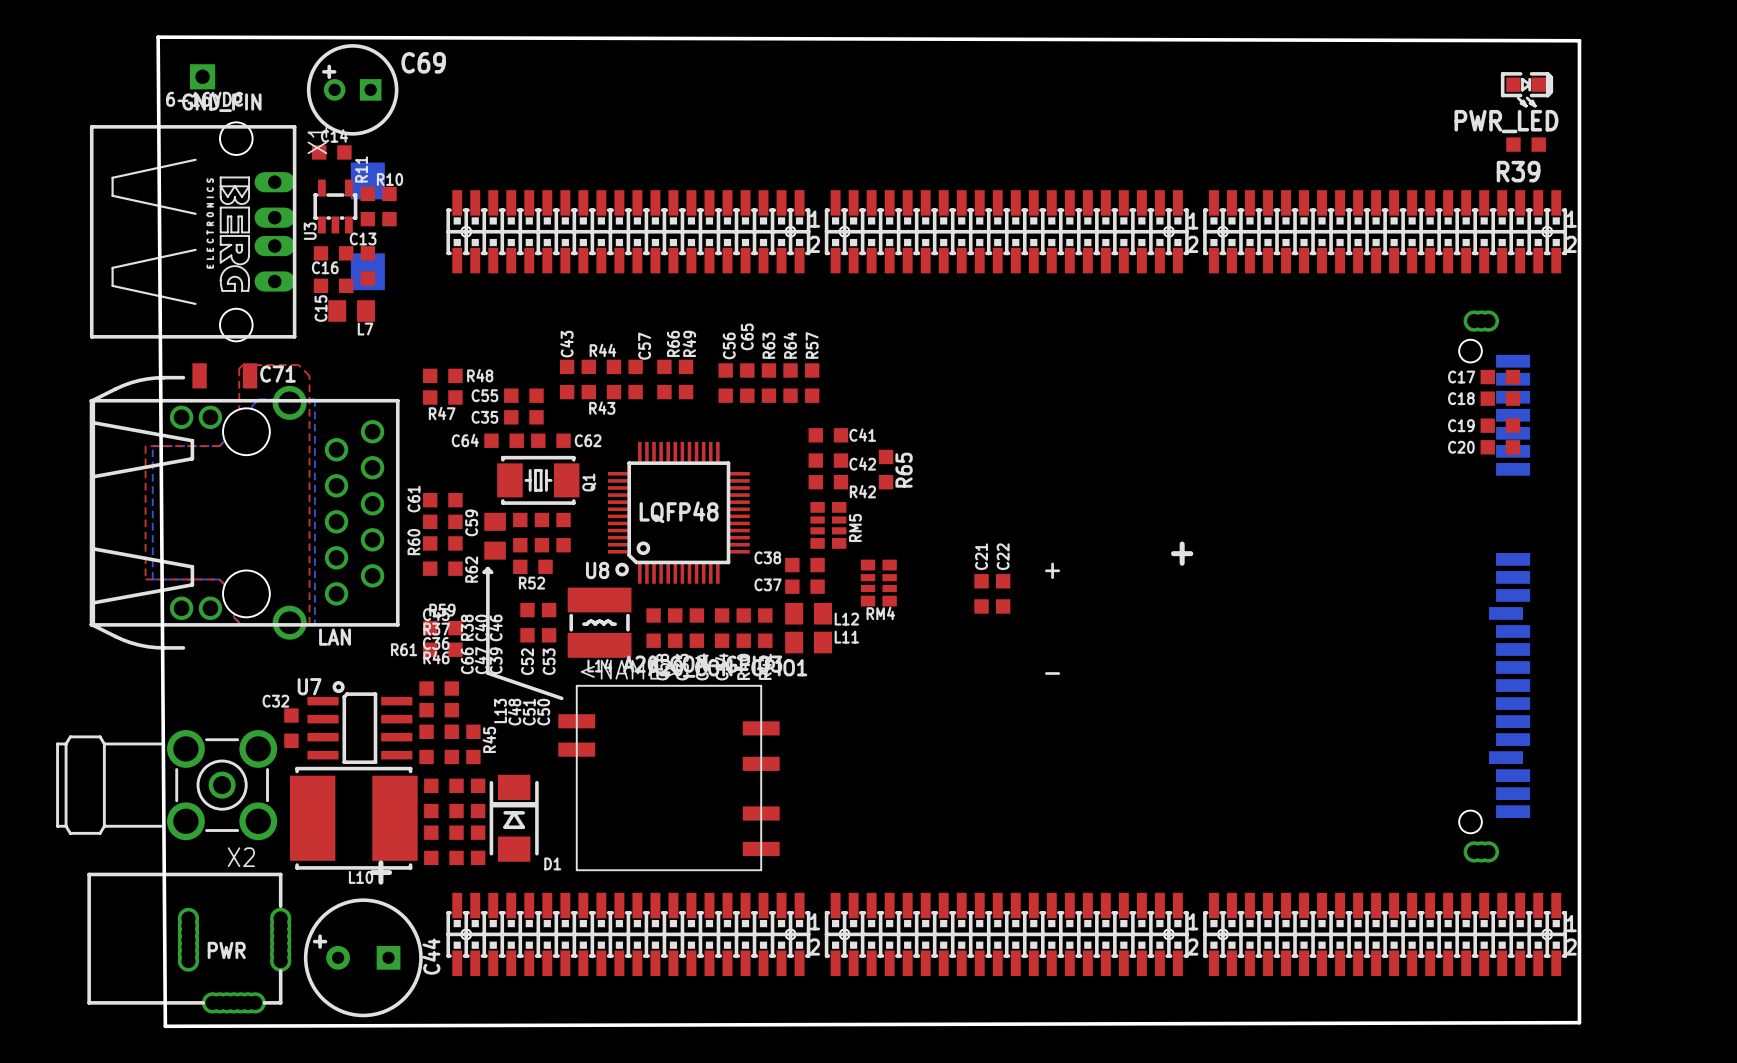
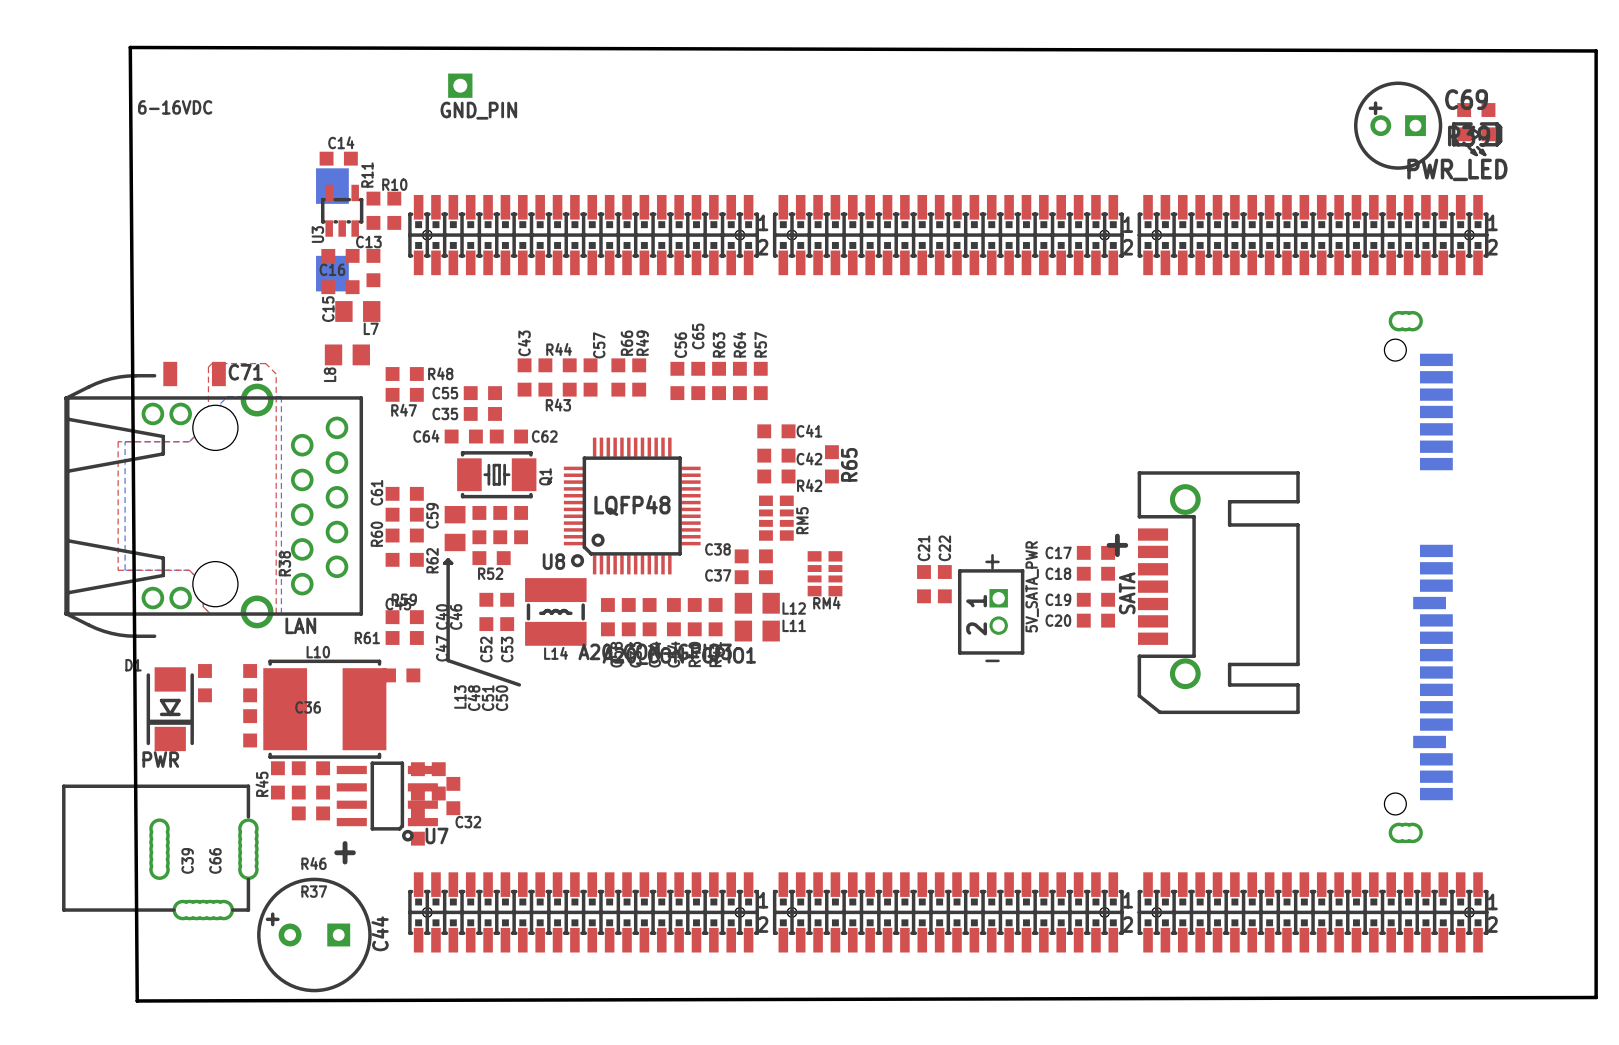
board edge: (158, 37) (1579, 40) (1579, 1022) (165, 1026) -> (130, 47) (1596, 50) (1596, 997) (137, 1000)
GND_PIN position: (202, 76) -> (460, 85)
C69 position: (352, 89) -> (1398, 125)
PWR_LED position: (1526, 89) -> (1477, 139)
R39 position: (1526, 144) -> (1476, 110)
C14 position: (331, 152) -> (338, 158)
U3 position: (335, 206) -> (342, 210)
R11 position: (367, 206) -> (373, 210)
R10 position: (389, 206) -> (394, 210)
X1: (193, 231) -> none
C16 position: (333, 253) -> (340, 255)
C13 position: (367, 265) -> (373, 268)
C15 position: (333, 285) -> (340, 287)
L7 position: (351, 311) -> (357, 311)
L8: none -> (347, 354)
C17 position: (1500, 377) -> (1095, 552)
C18 position: (1500, 398) -> (1095, 573)
C19 position: (1500, 425) -> (1095, 599)
C20 position: (1500, 447) -> (1095, 620)
SATA: none -> (1218, 592)
5V_SATA_PWR: none -> (991, 611)
R37 name position: R37 (436, 629) -> R37 (314, 891)
R46 name position: R46 (436, 657) -> R46 (313, 863)
C66 name position: C66 (467, 660) -> C66 (215, 860)
C39 name position: C39 (496, 660) -> C39 (187, 860)
C32 name position: C32 (275, 701) -> C32 (468, 822)
R37 position: (439, 710) -> (310, 813)
U7 rotation: 0° (359, 722) -> 180° (387, 801)
U7 position: (359, 722) -> (387, 801)
C32 position: (291, 728) -> (453, 796)
C36 position: (439, 731) -> (310, 792)
R45 name position: R45 (489, 739) -> R45 (262, 784)
R45 position: (473, 744) -> (277, 780)
R46 position: (439, 757) -> (310, 768)
part: (668, 778) -> none
X2: (166, 785) -> none
R38 position: (431, 798) -> (250, 728)
L10 position: (353, 818) -> (324, 709)
D1 rotation: 0° (514, 818) -> 180° (170, 709)
D1 position: (514, 818) -> (170, 709)
C66 position: (431, 845) -> (250, 683)
C39 position: (478, 845) -> (204, 683)
L10 name position: L10 (361, 877) -> L10 (318, 652)
PWR position: (189, 943) -> (160, 852)
PWR name position: PWR (226, 950) -> PWR (160, 759)
C44 position: (363, 957) -> (314, 934)

